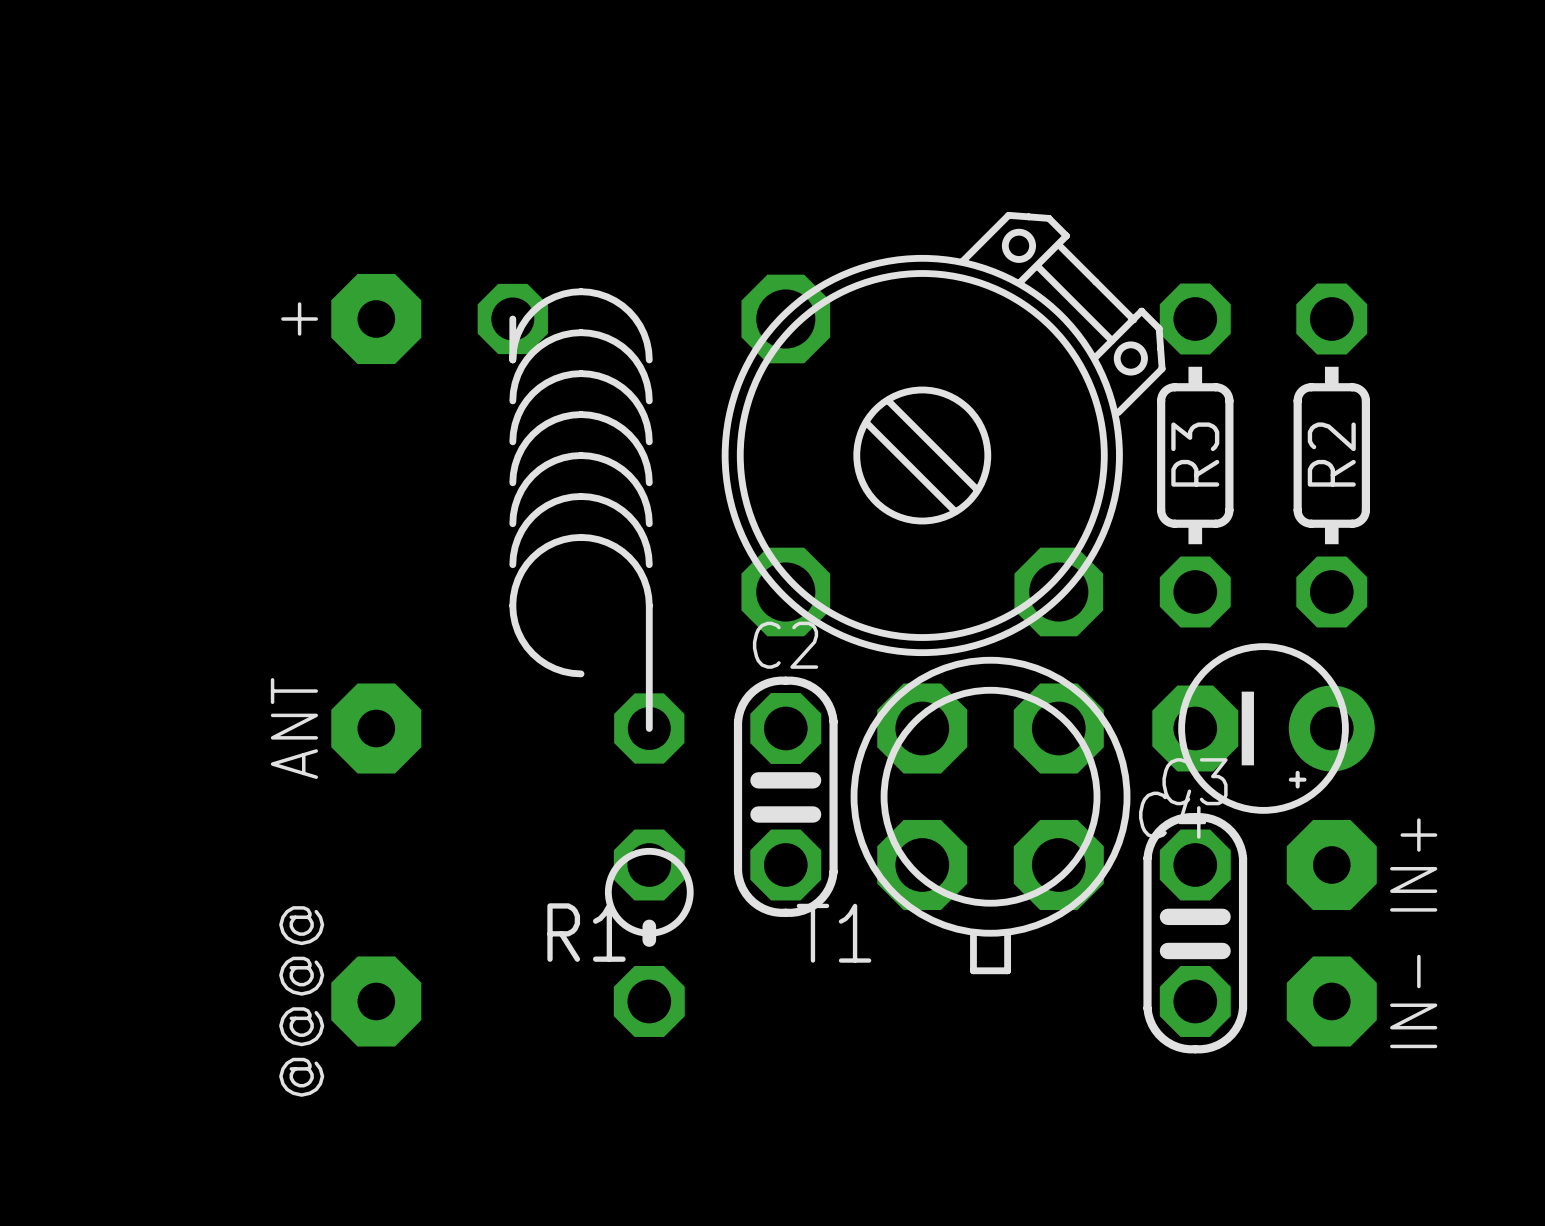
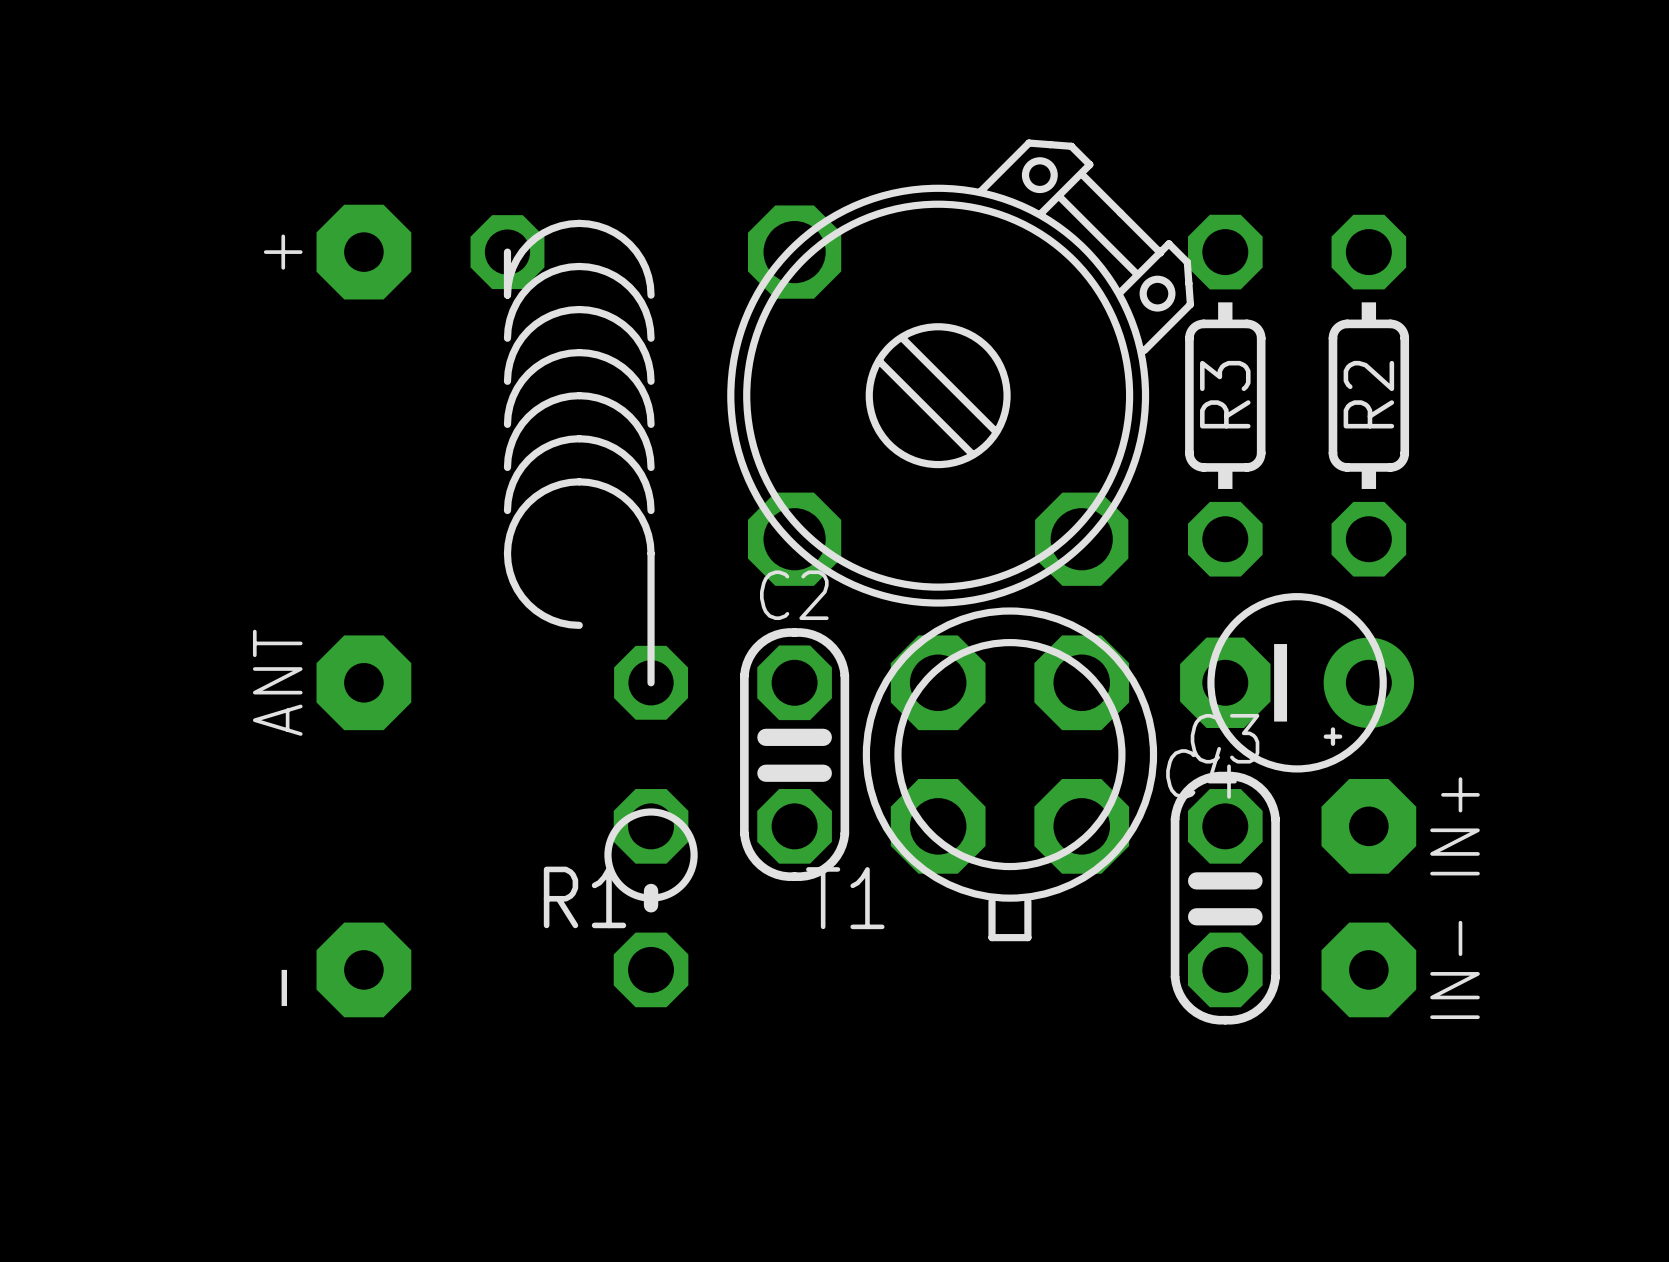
part name: @@@@ (301, 1001) -> ̶̶ (284, 987)

